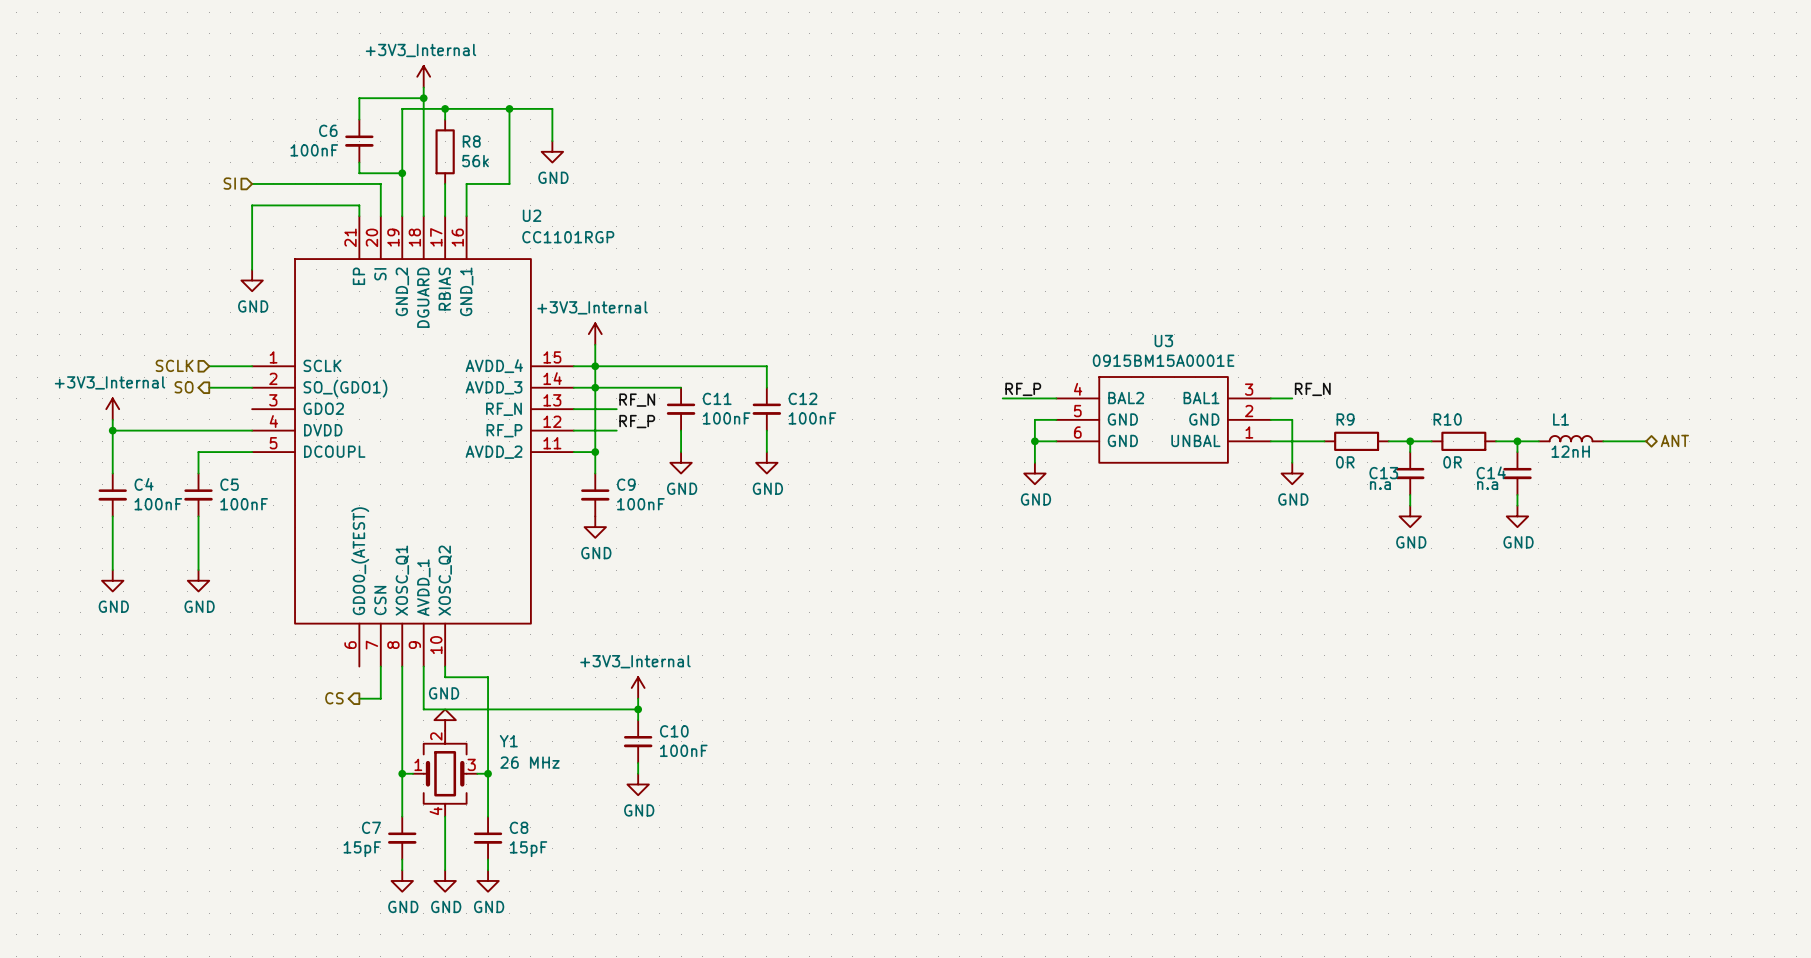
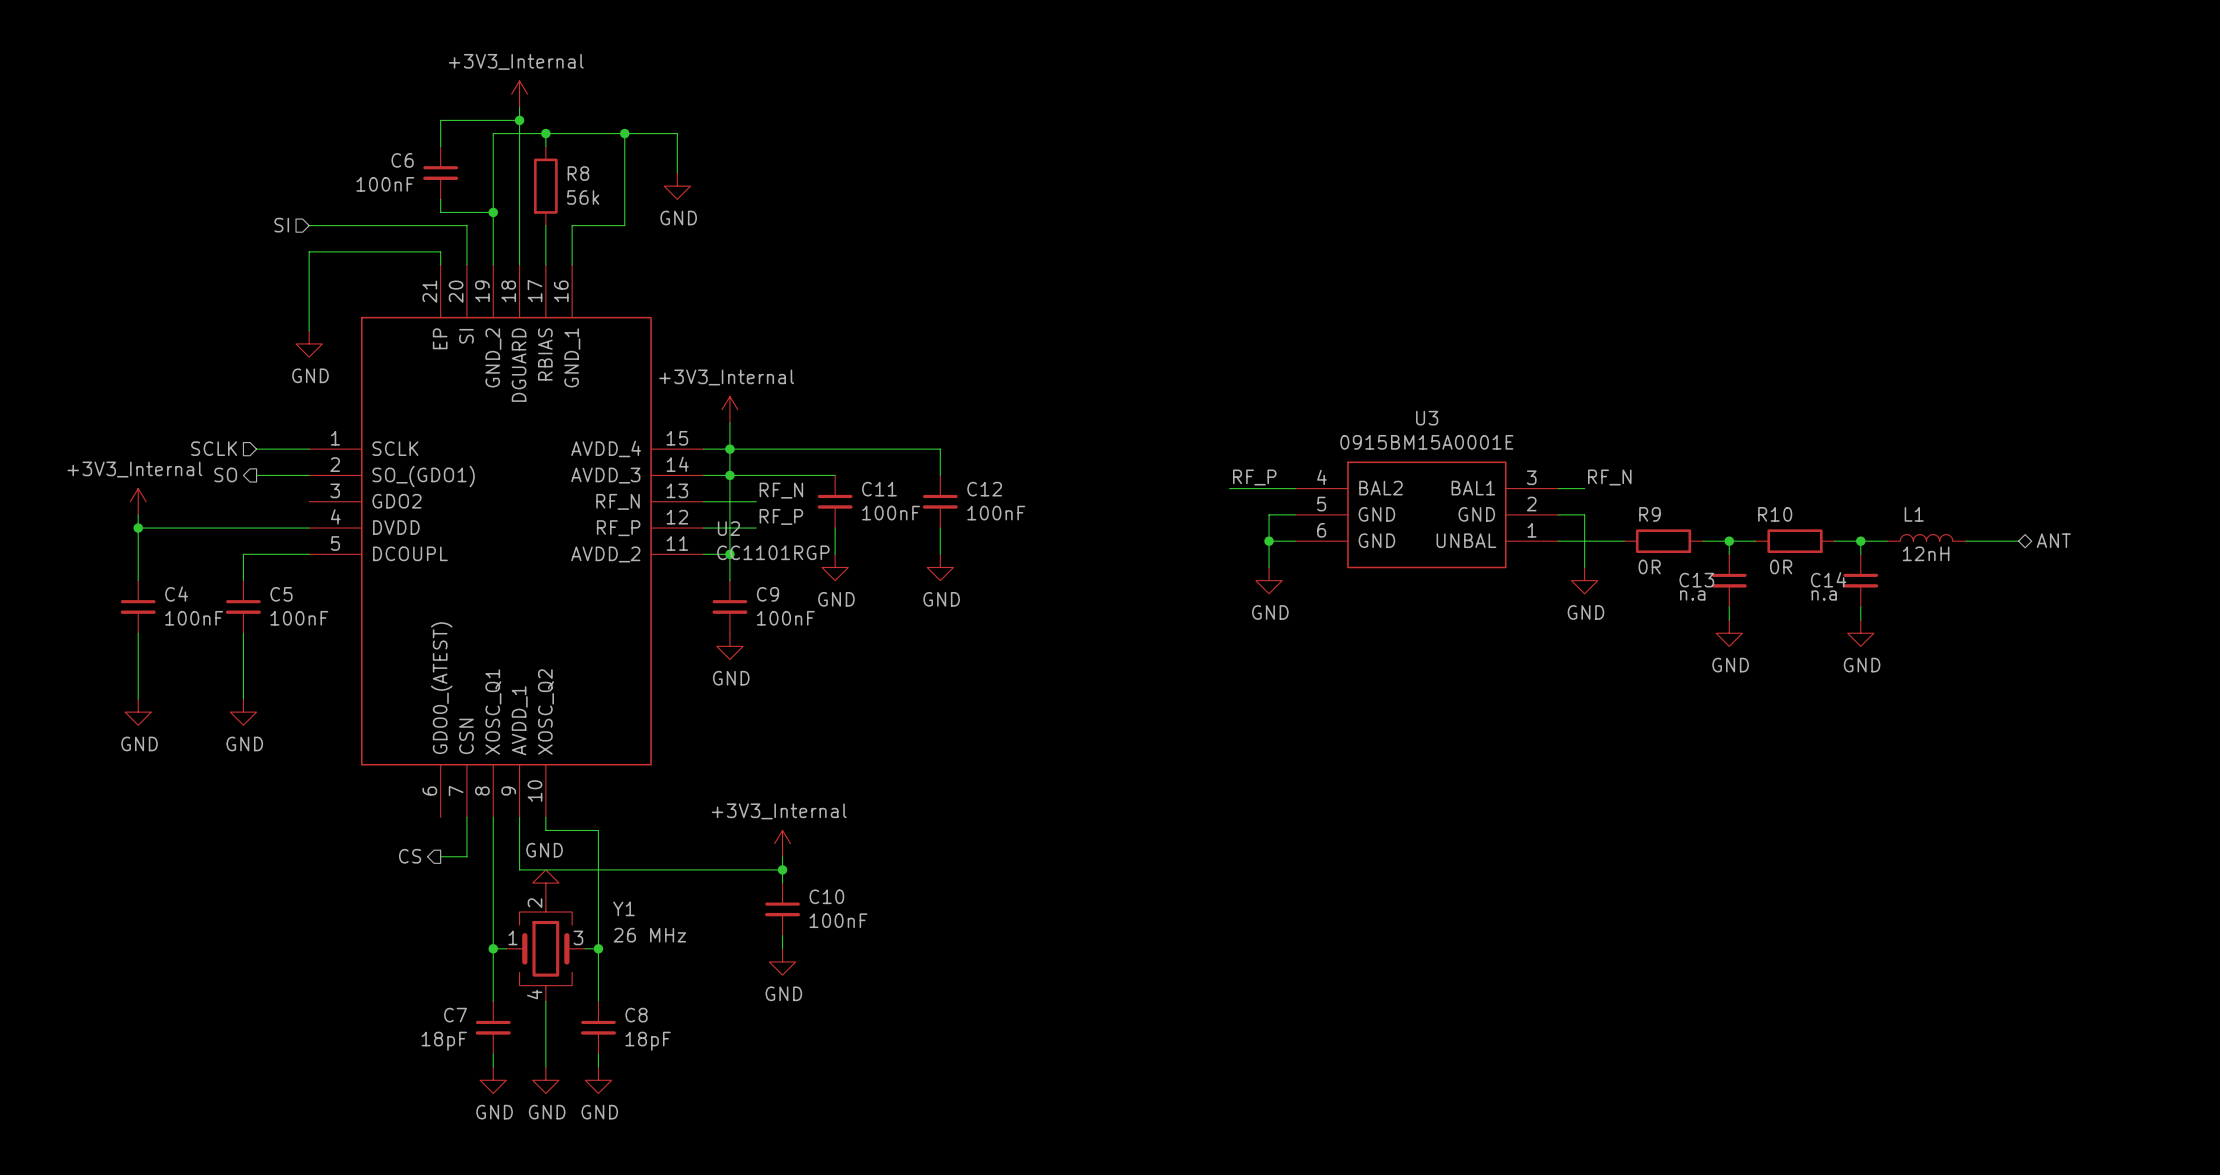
U2 name position: U2 (532, 215) -> U2 (728, 528)
U2 value position: CC1101RGP (568, 237) -> CC1101RGP (773, 552)
C7 value: 15pF (362, 849) -> 18pF (444, 1041)
C8 value: 15pF (528, 849) -> 18pF (648, 1041)

